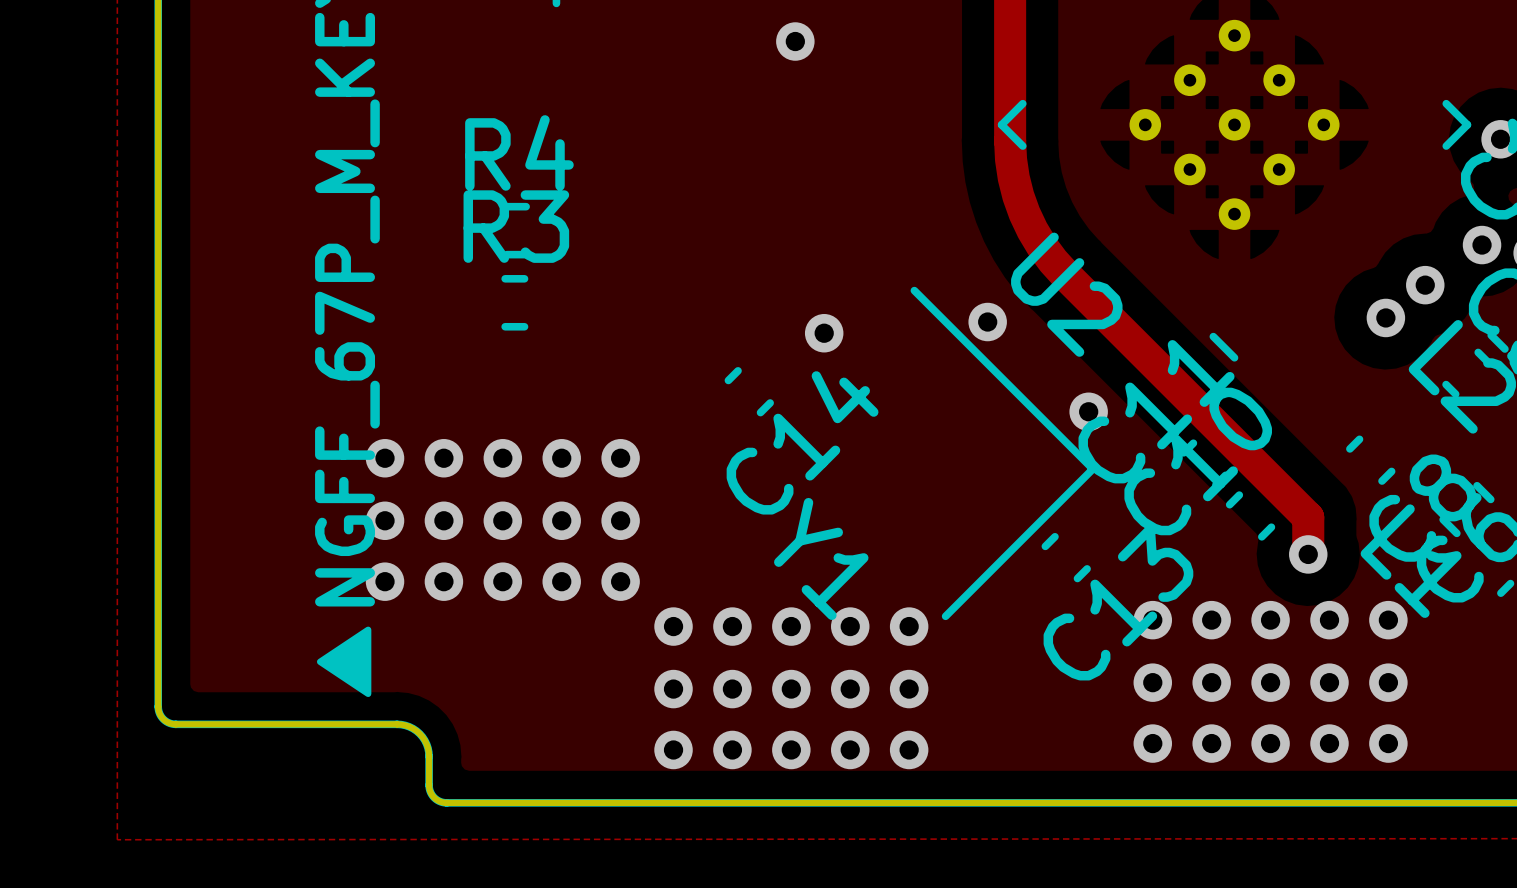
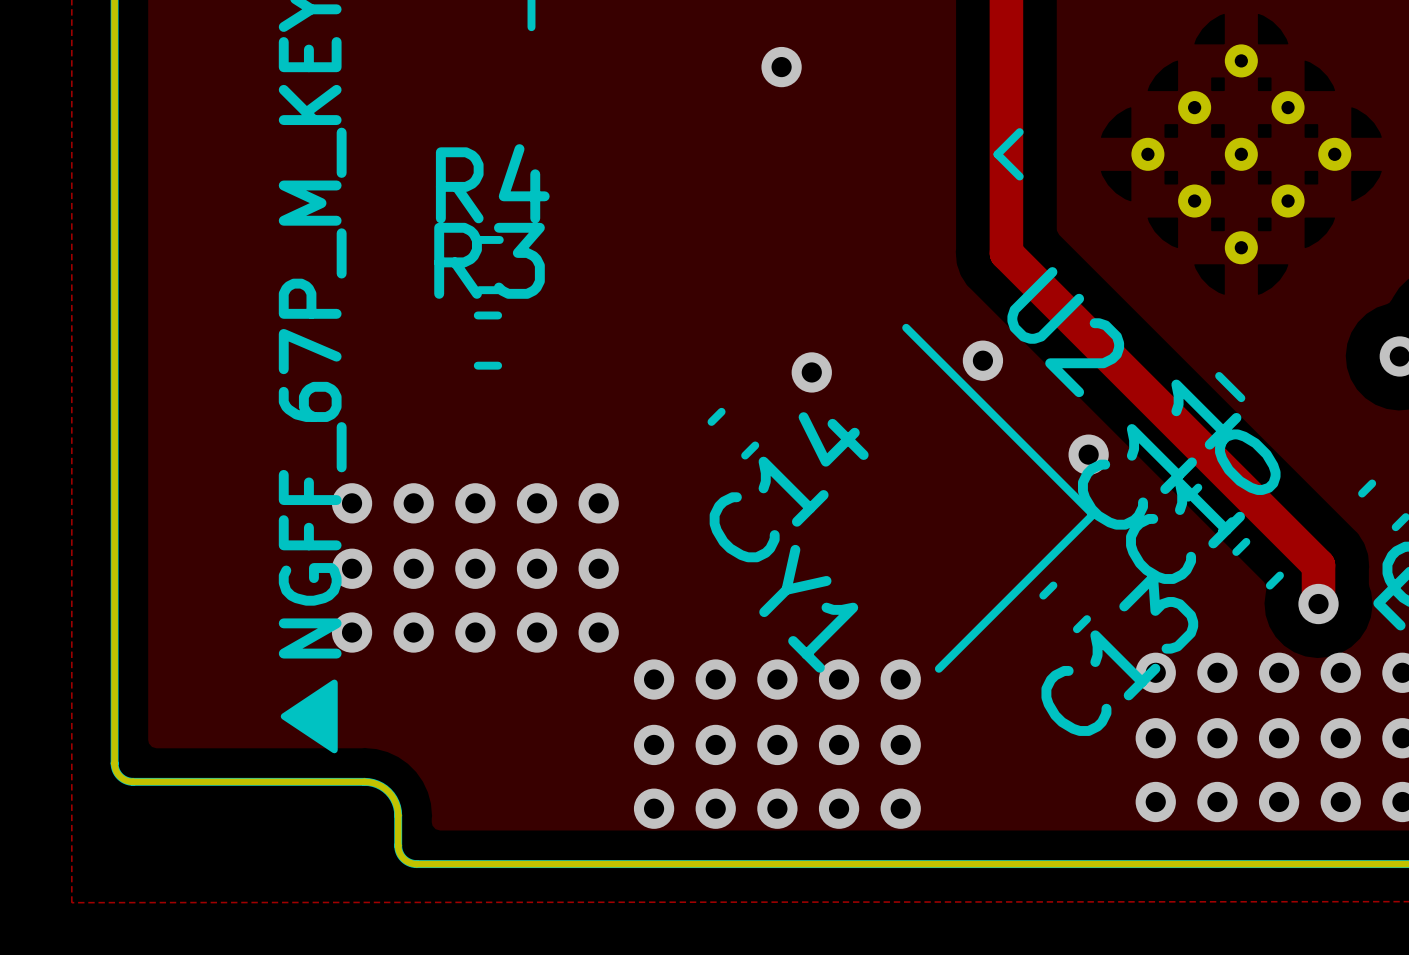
track: (1010, 141) (1013, 177) (1024, 213) (1042, 246) (1065, 274) -> (1006, 171) (1006, 253) (1064, 311)

